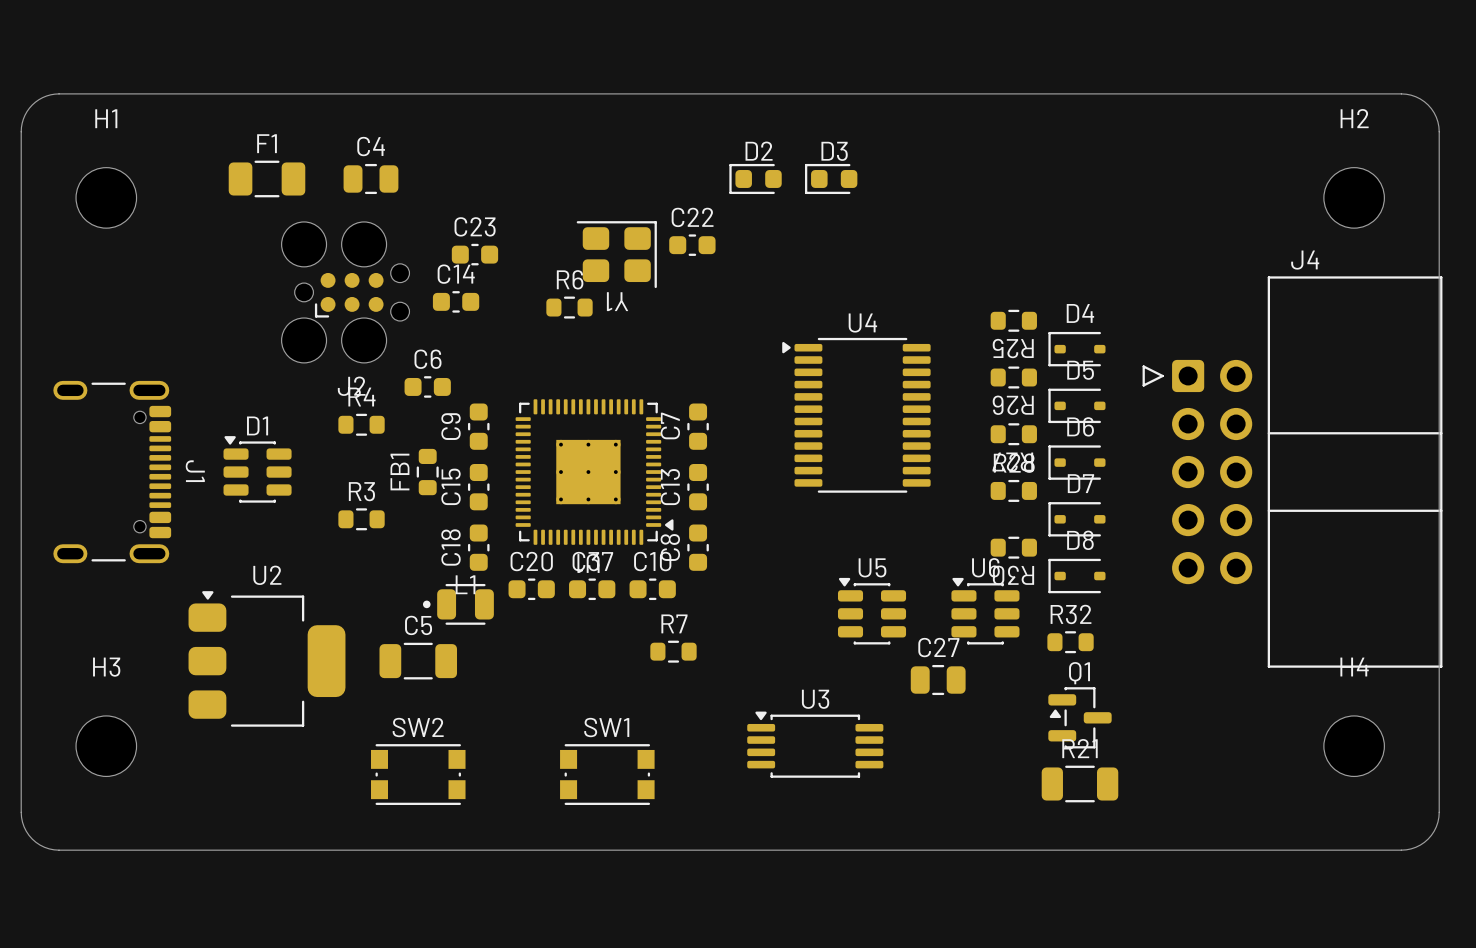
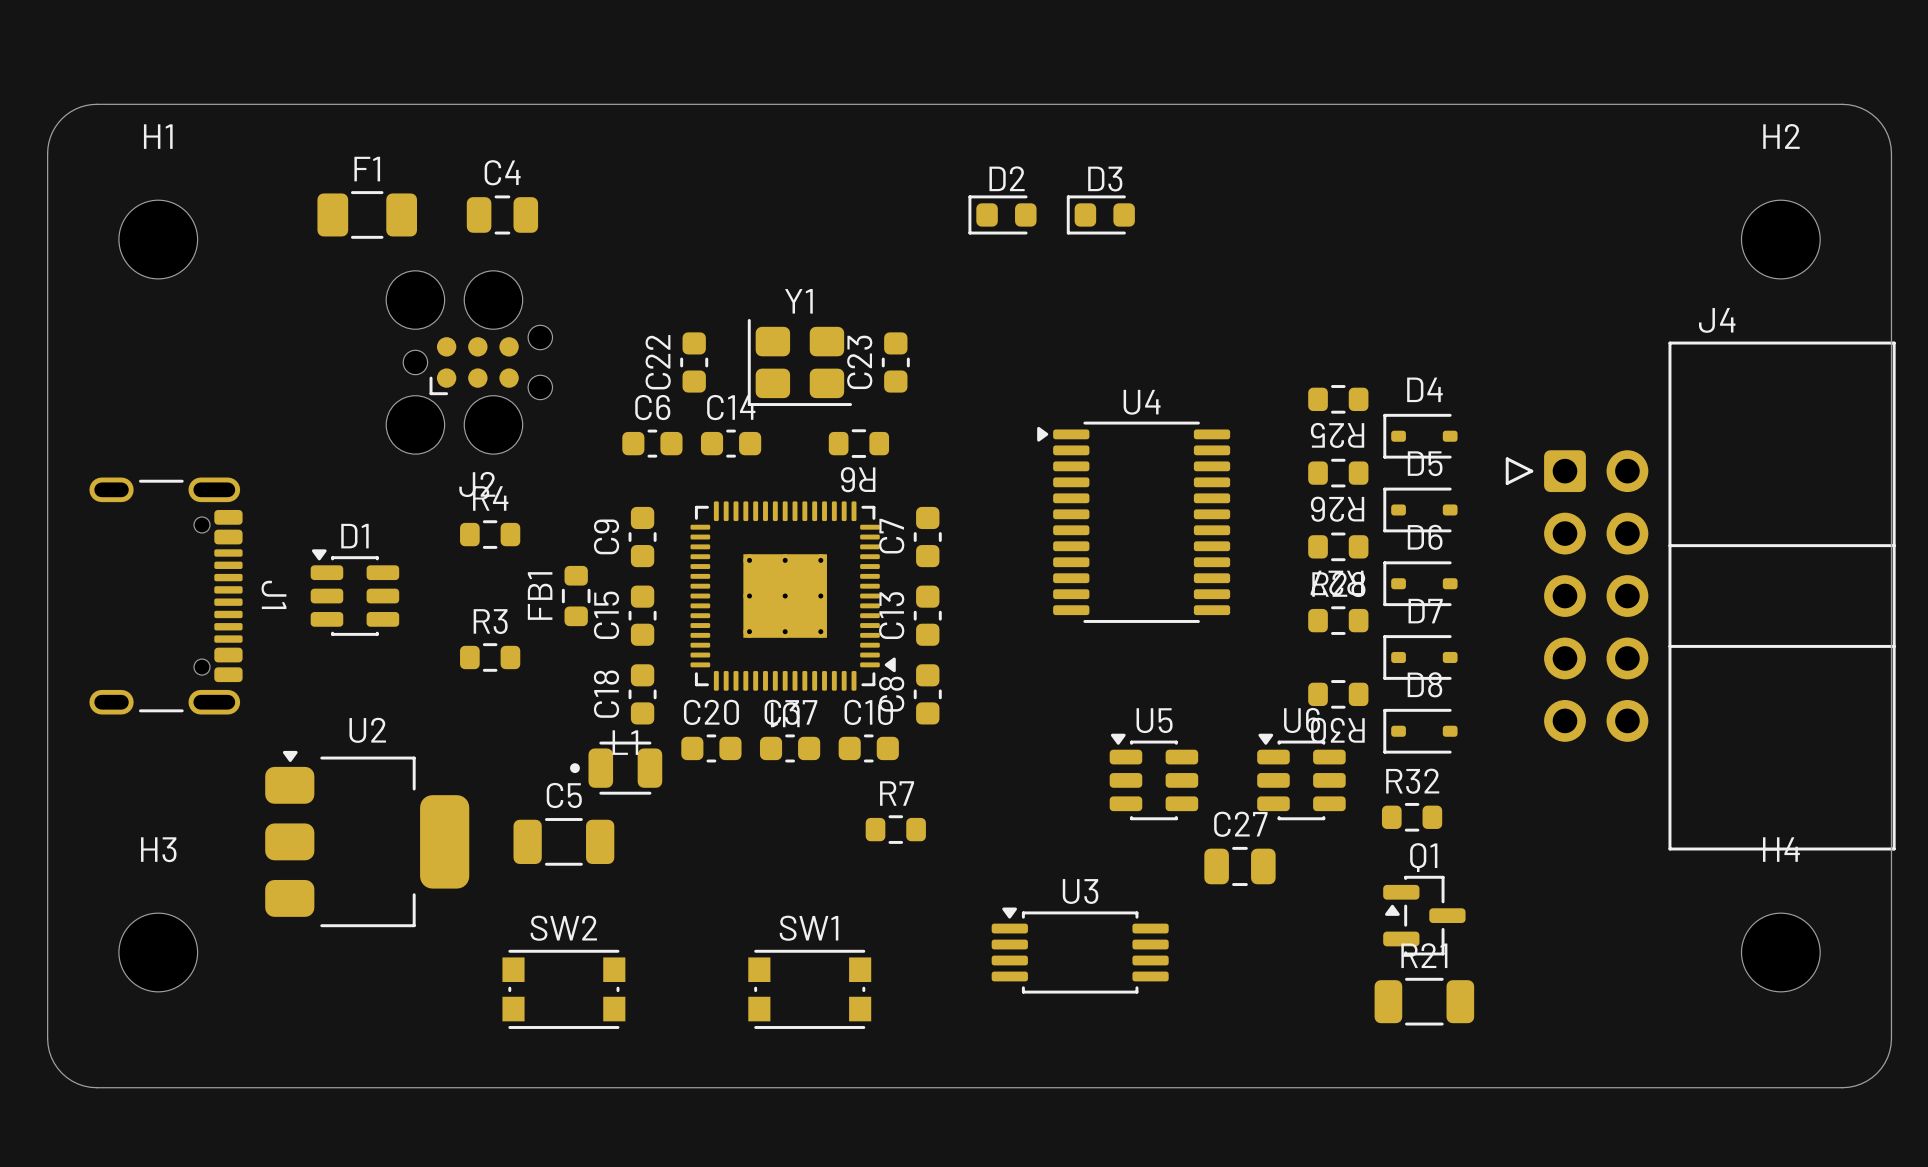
C22 name position: C22 (692, 217) -> C22 (658, 362)
C23 name position: C23 (475, 226) -> C23 (859, 362)
C22 rotation: 0° (692, 245) -> 90° clockwise (694, 362)
C22 position: (692, 245) -> (694, 362)
C23 rotation: 0° (474, 254) -> 90° clockwise (895, 362)
C23 position: (474, 254) -> (895, 362)
Y1 rotation: 0° (616, 254) -> 180° (799, 362)
R6 name rotation: 0° (570, 279) -> 180° (858, 479)
R6 name position: R6 (570, 279) -> R6 (858, 479)
C14 position: (456, 301) -> (731, 443)
R6 position: (569, 307) -> (858, 443)
C6 position: (427, 386) -> (652, 443)

